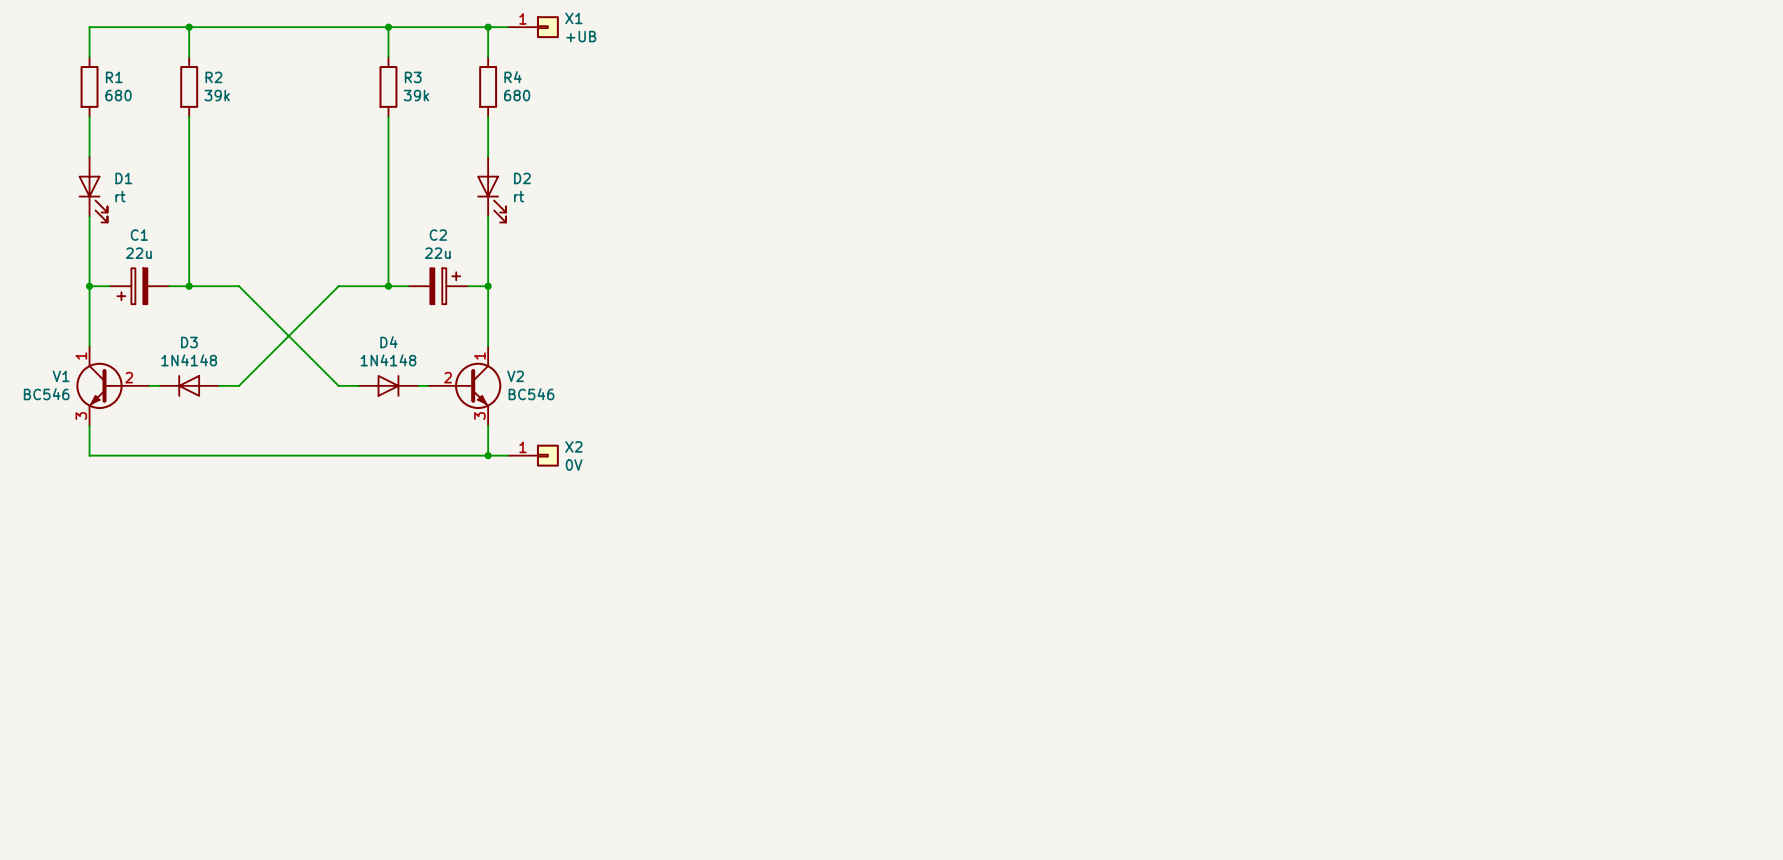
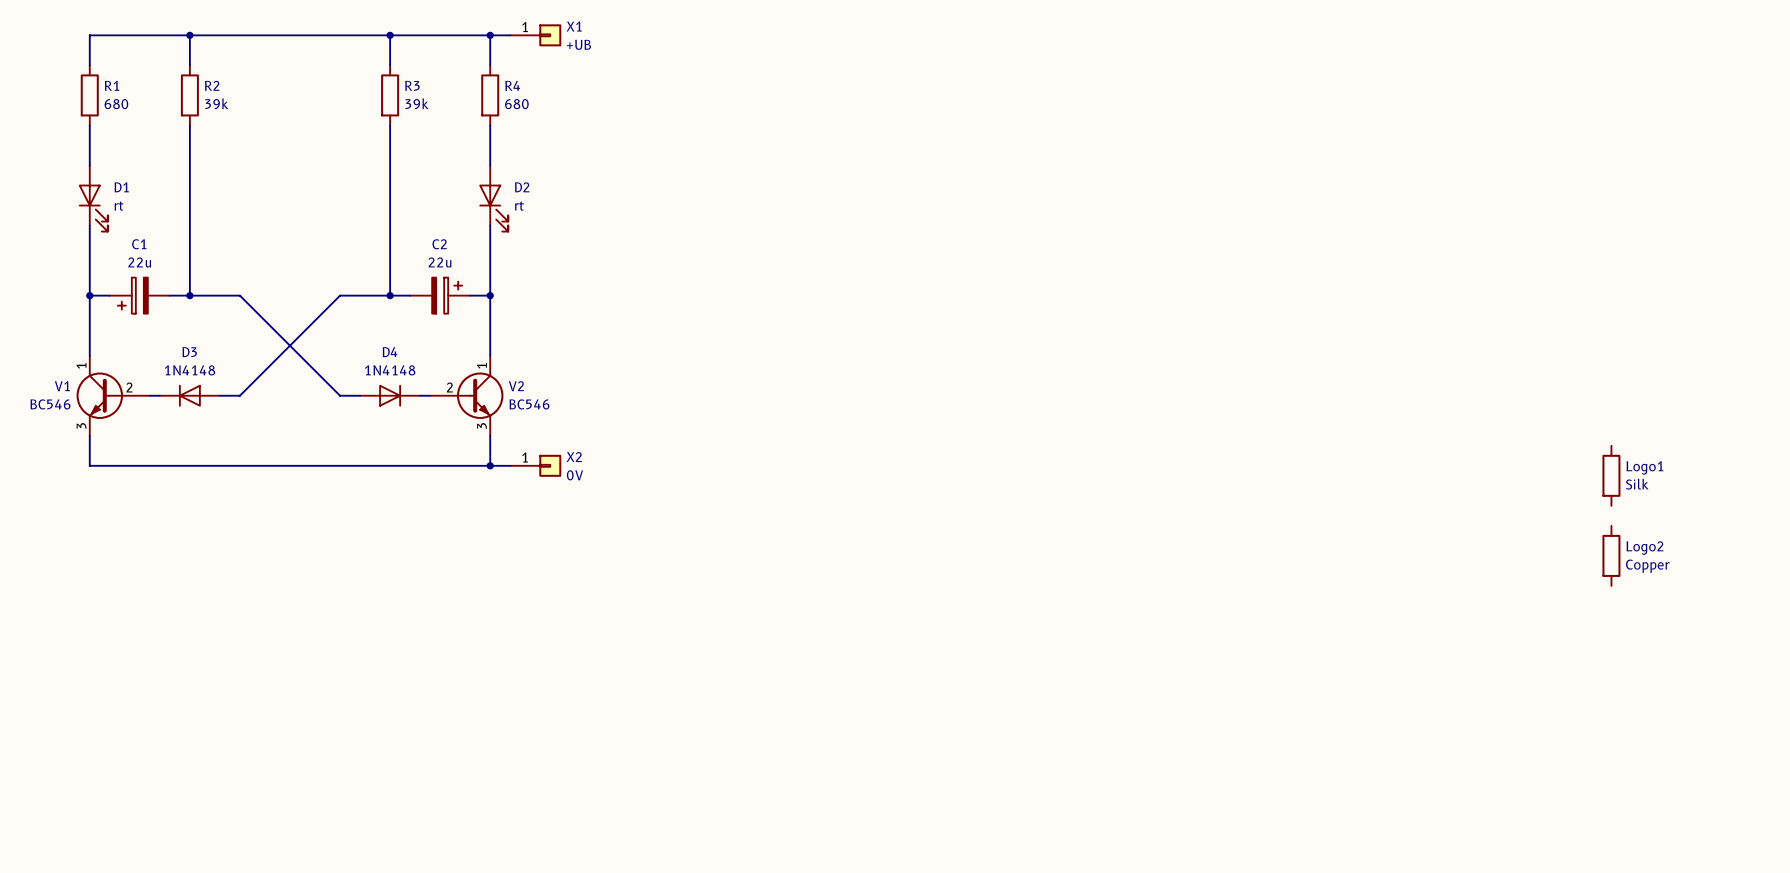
Logo1: none -> Silk (1611, 475)
Logo2: none -> Copper (1611, 555)

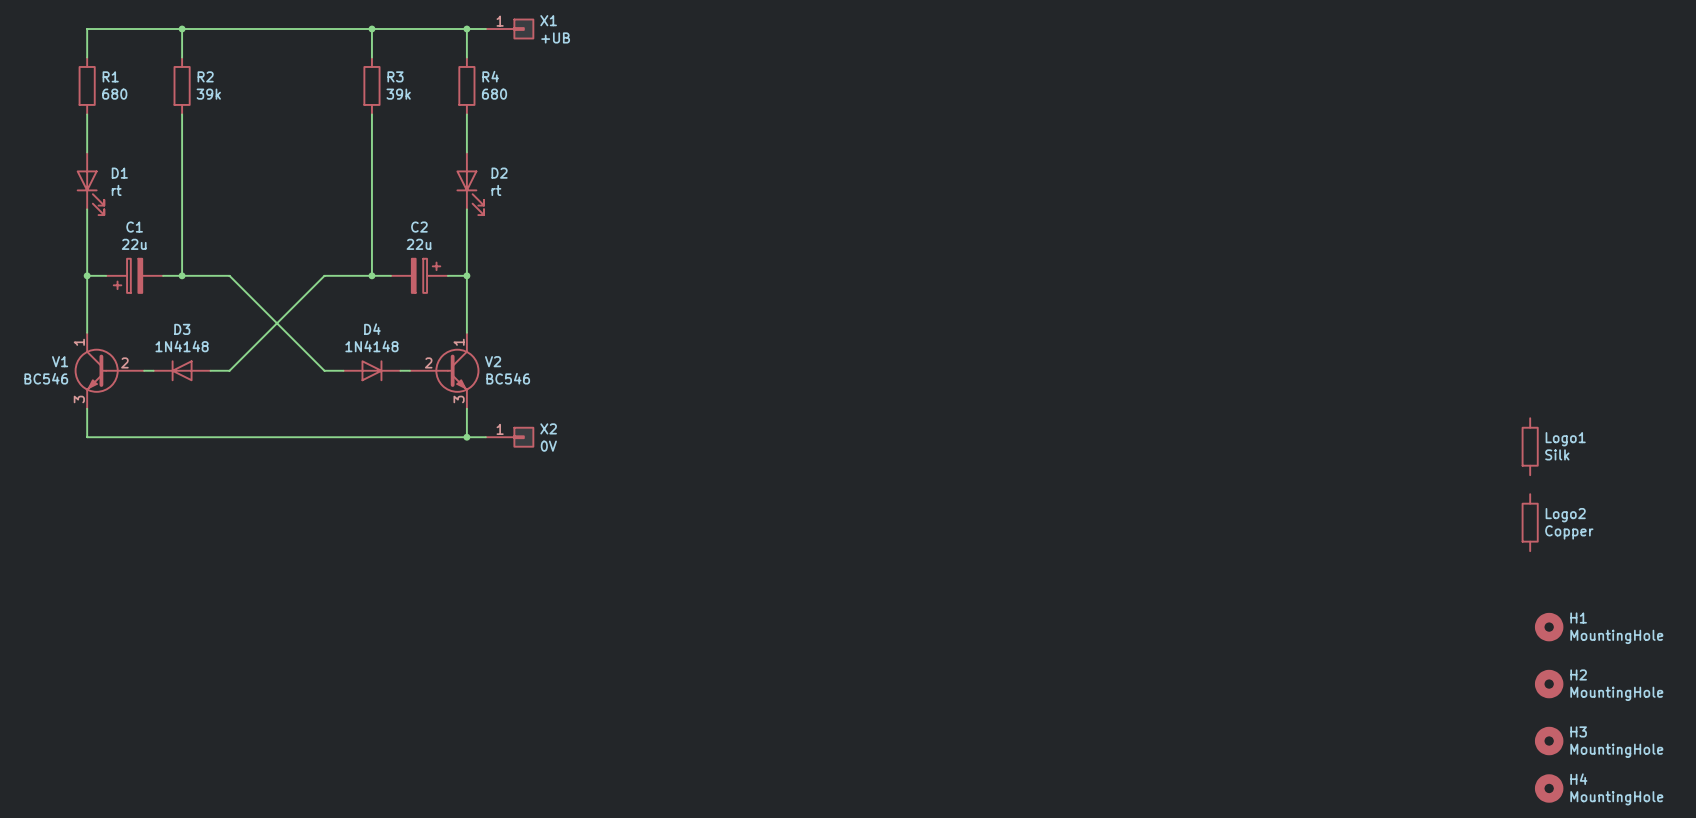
H1: none -> MountingHole (1549, 627)
H2: none -> MountingHole (1549, 684)
H3: none -> MountingHole (1549, 741)
H4: none -> MountingHole (1549, 788)

